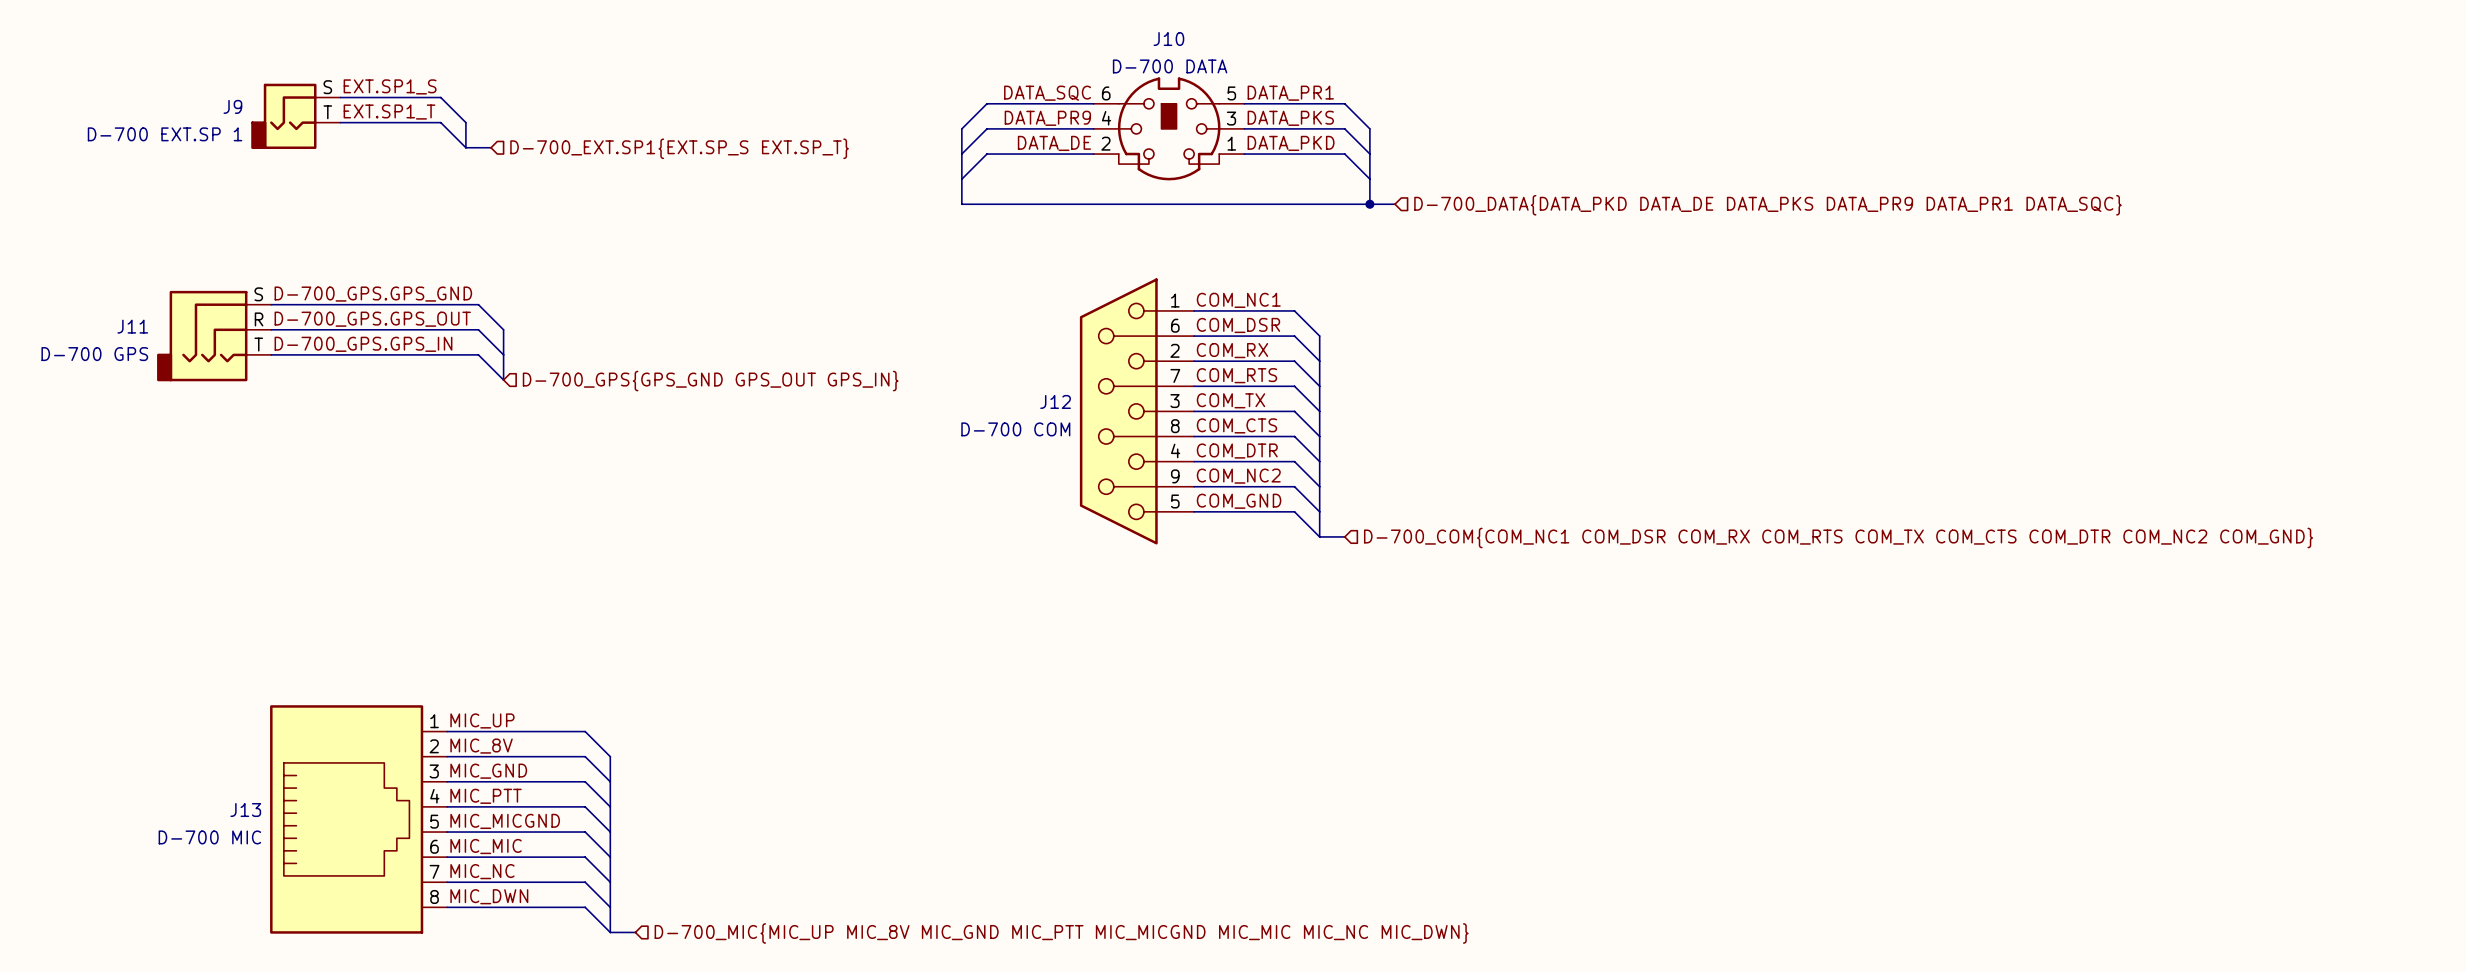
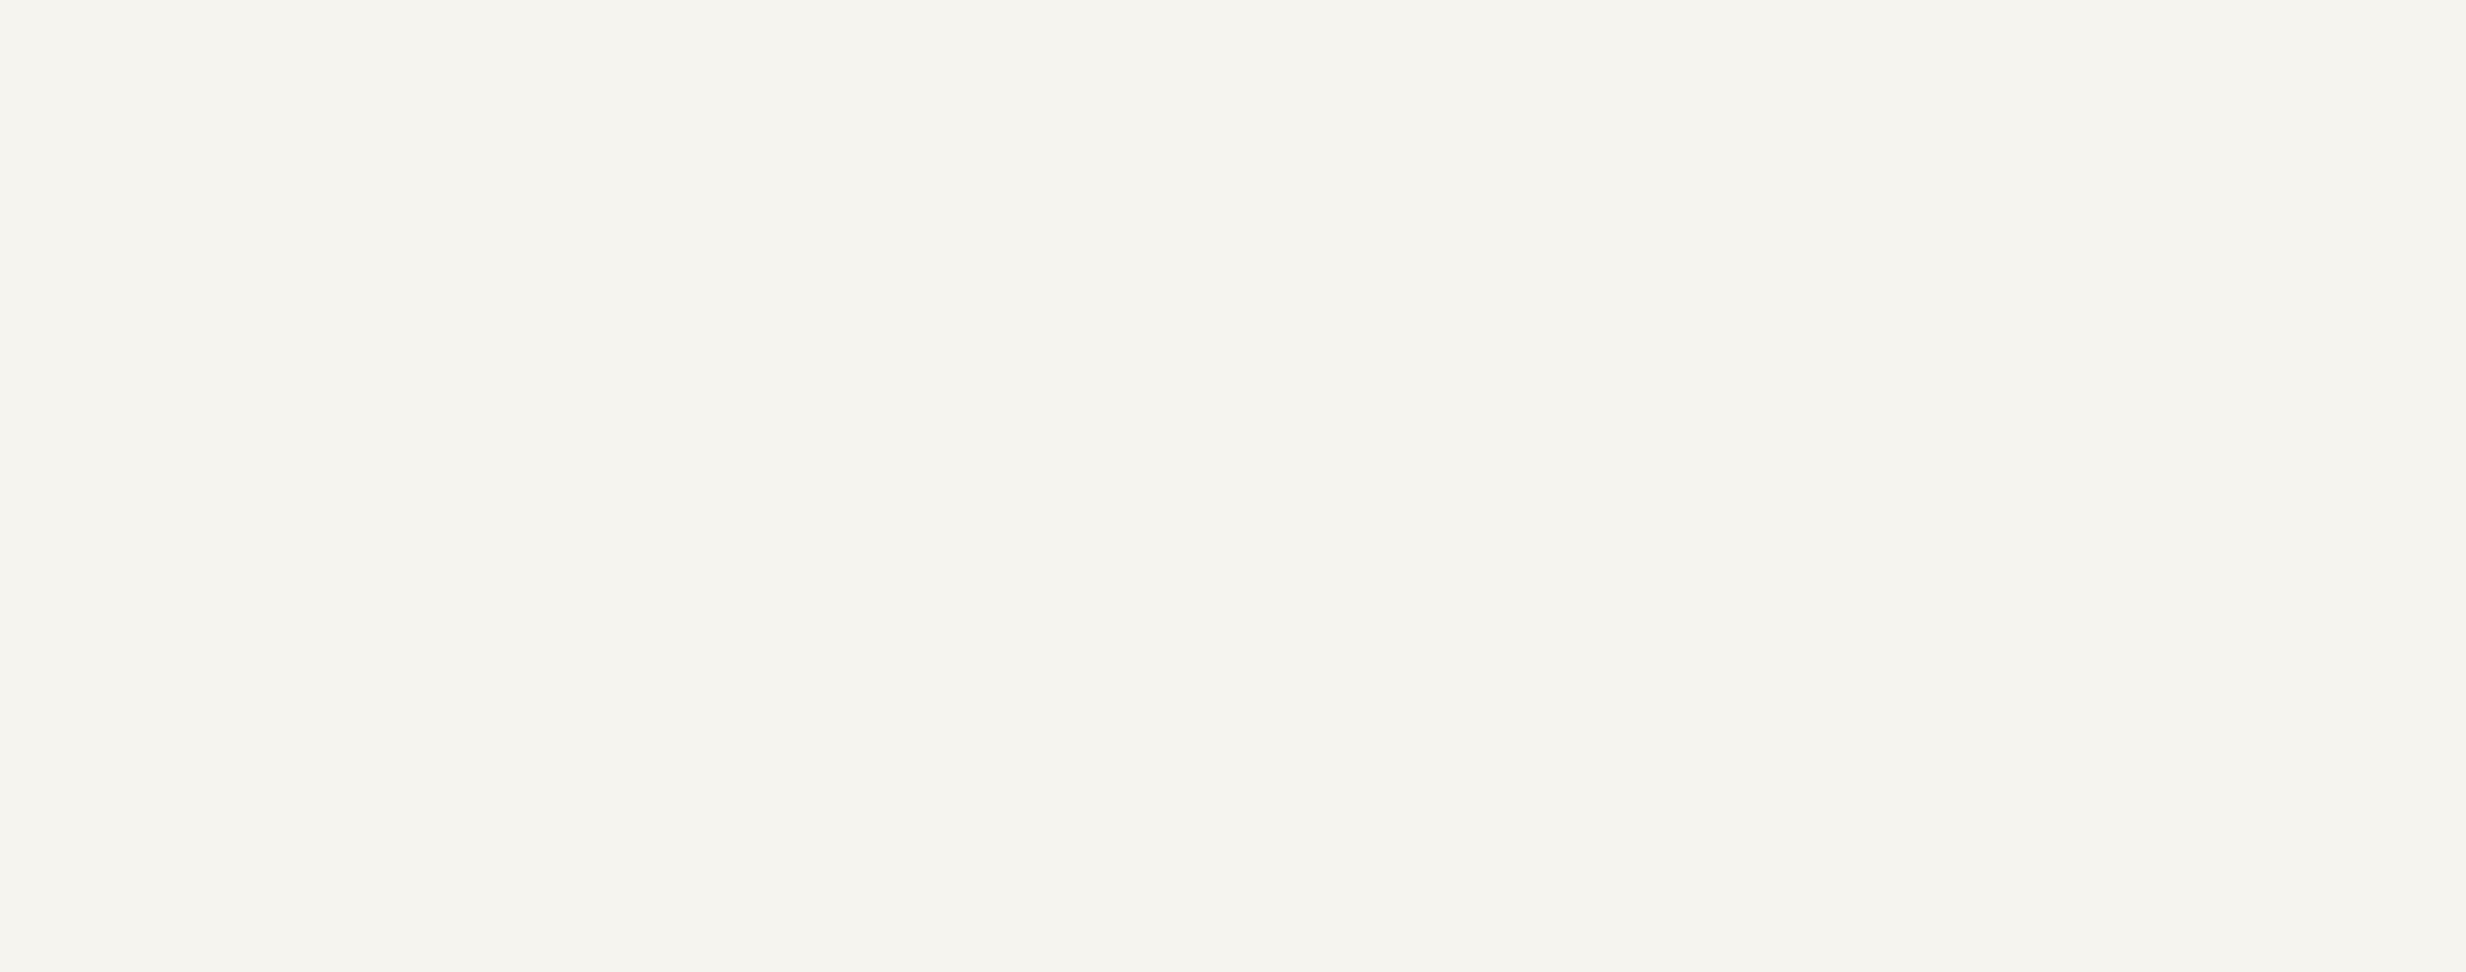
label: EXT.SP1_S (390, 86) -> none
label: DATA_SQC (1047, 93) -> none
label: DATA_PR1 (1290, 93) -> none
wire: (340, 97) (440, 97) (465, 122) -> none
wire: (1093, 103) (986, 103) (961, 128) -> none
wire: (1244, 103) (1344, 103) (1369, 128) -> none
label: EXT.SP1_T (389, 112) -> none
J9: D-700 EXT.SP 1 (295, 116) -> none
label: DATA_PR9 (1047, 118) -> none
label: DATA_PKS (1290, 118) -> none
wire: (340, 122) (440, 122) (465, 147) -> none
bus: (465, 122) (465, 147) (491, 147) -> none
bus: (961, 128) (961, 204) (1395, 204) -> none
wire: (1093, 128) (986, 128) (961, 154) -> none
J10: D-700 DATA (1169, 128) -> none
wire: (1244, 128) (1344, 128) (1369, 154) -> none
bus: (1369, 128) (1369, 204) -> none
label: DATA_DE (1054, 143) -> none
label: DATA_PKD (1291, 143) -> none
hierarchical label: D-700_EXT.SP1{EXT.SP_S EXT.SP_T} (679, 148) -> none
wire: (1093, 154) (986, 154) (961, 179) -> none
wire: (1244, 154) (1344, 154) (1369, 179) -> none
junction: (1369, 204) -> none
hierarchical label: D-700_DATA{DATA_PKD DATA_DE DATA_PKS DATA_PR9 DATA_PR1 DATA_SQC} (1767, 205) -> none
label: D-700_GPS.GPS_GND (373, 294) -> none
label: COM_NC1 (1238, 300) -> none
wire: (271, 304) (478, 304) (503, 329) -> none
wire: (1194, 310) (1294, 310) (1319, 336) -> none
label: D-700_GPS.GPS_OUT (372, 319) -> none
label: COM_DSR (1238, 325) -> none
wire: (271, 329) (478, 329) (503, 354) -> none
bus: (503, 329) (503, 380) -> none
J11: D-700 GPS (214, 336) -> none
wire: (1194, 336) (1294, 336) (1319, 361) -> none
bus: (1319, 336) (1319, 536) (1344, 536) -> none
label: D-700_GPS.GPS_IN (363, 344) -> none
label: COM_RX (1232, 350) -> none
wire: (271, 354) (478, 354) (503, 380) -> none
wire: (1194, 361) (1294, 361) (1319, 386) -> none
label: COM_RTS (1236, 375) -> none
hierarchical label: D-700_GPS{GPS_GND GPS_OUT GPS_IN} (710, 381) -> none
wire: (1194, 386) (1294, 386) (1319, 411) -> none
label: COM_TX (1230, 400) -> none
J12: D-700 COM (1137, 411) -> none
wire: (1194, 411) (1294, 411) (1319, 436) -> none
label: COM_CTS (1236, 425) -> none
wire: (1194, 436) (1294, 436) (1319, 461) -> none
label: COM_DTR (1237, 451) -> none
wire: (1194, 461) (1294, 461) (1319, 486) -> none
label: COM_NC2 (1238, 476) -> none
wire: (1194, 486) (1294, 486) (1319, 511) -> none
label: COM_GND (1239, 501) -> none
wire: (1194, 511) (1294, 511) (1319, 536) -> none
hierarchical label: D-700_COM{COM_NC1 COM_DSR COM_RX COM_RTS COM_TX COM_CTS COM_DTR COM_NC2 COM_GND} (1838, 537) -> none
label: MIC_UP (482, 720) -> none
wire: (447, 731) (585, 731) (610, 756) -> none
label: MIC_8V (481, 746) -> none
wire: (447, 756) (585, 756) (610, 781) -> none
bus: (610, 756) (610, 932) (635, 932) -> none
label: MIC_GND (488, 771) -> none
wire: (447, 781) (585, 781) (610, 806) -> none
label: MIC_PTT (486, 796) -> none
wire: (447, 806) (585, 806) (610, 832) -> none
J13: D-700 MIC (358, 819) -> none
label: MIC_MICGND (505, 821) -> none
wire: (447, 832) (585, 832) (610, 857) -> none
label: MIC_MIC (486, 846) -> none
wire: (447, 857) (585, 857) (610, 882) -> none
label: MIC_NC (482, 871) -> none
wire: (447, 882) (585, 882) (610, 907) -> none
label: MIC_DWN (489, 896) -> none
wire: (447, 907) (585, 907) (610, 932) -> none
hierarchical label: D-700_MIC{MIC_UP MIC_8V MIC_GND MIC_PTT MIC_MICGND MIC_MIC MIC_NC MIC_DWN} (1061, 933) -> none

